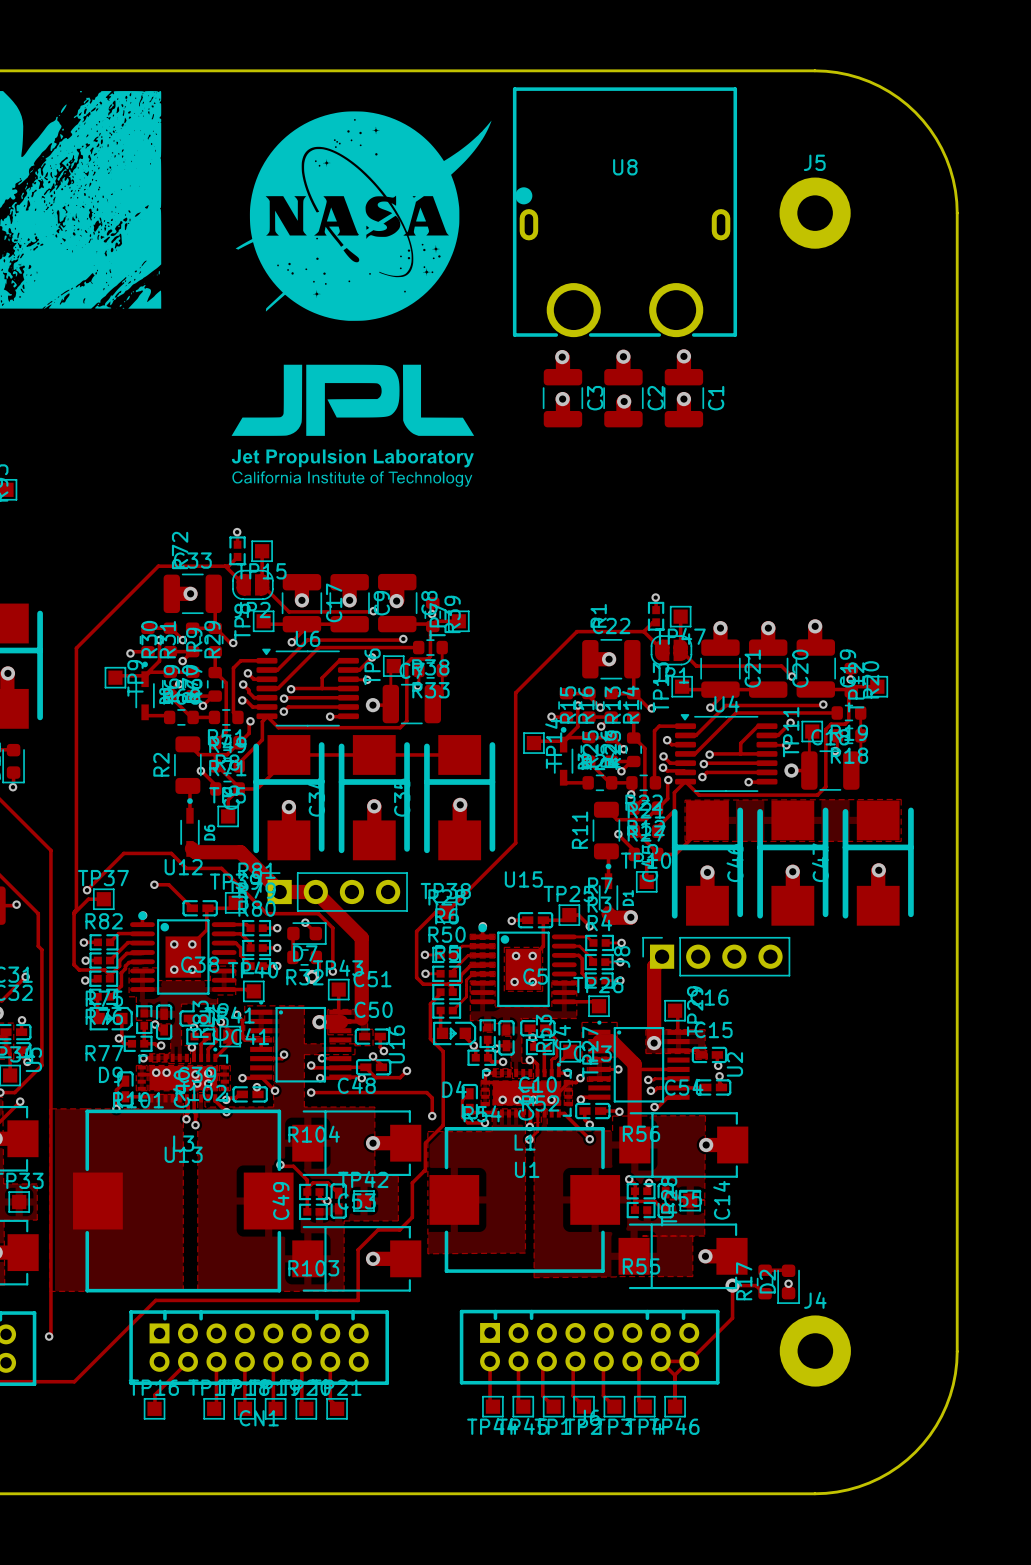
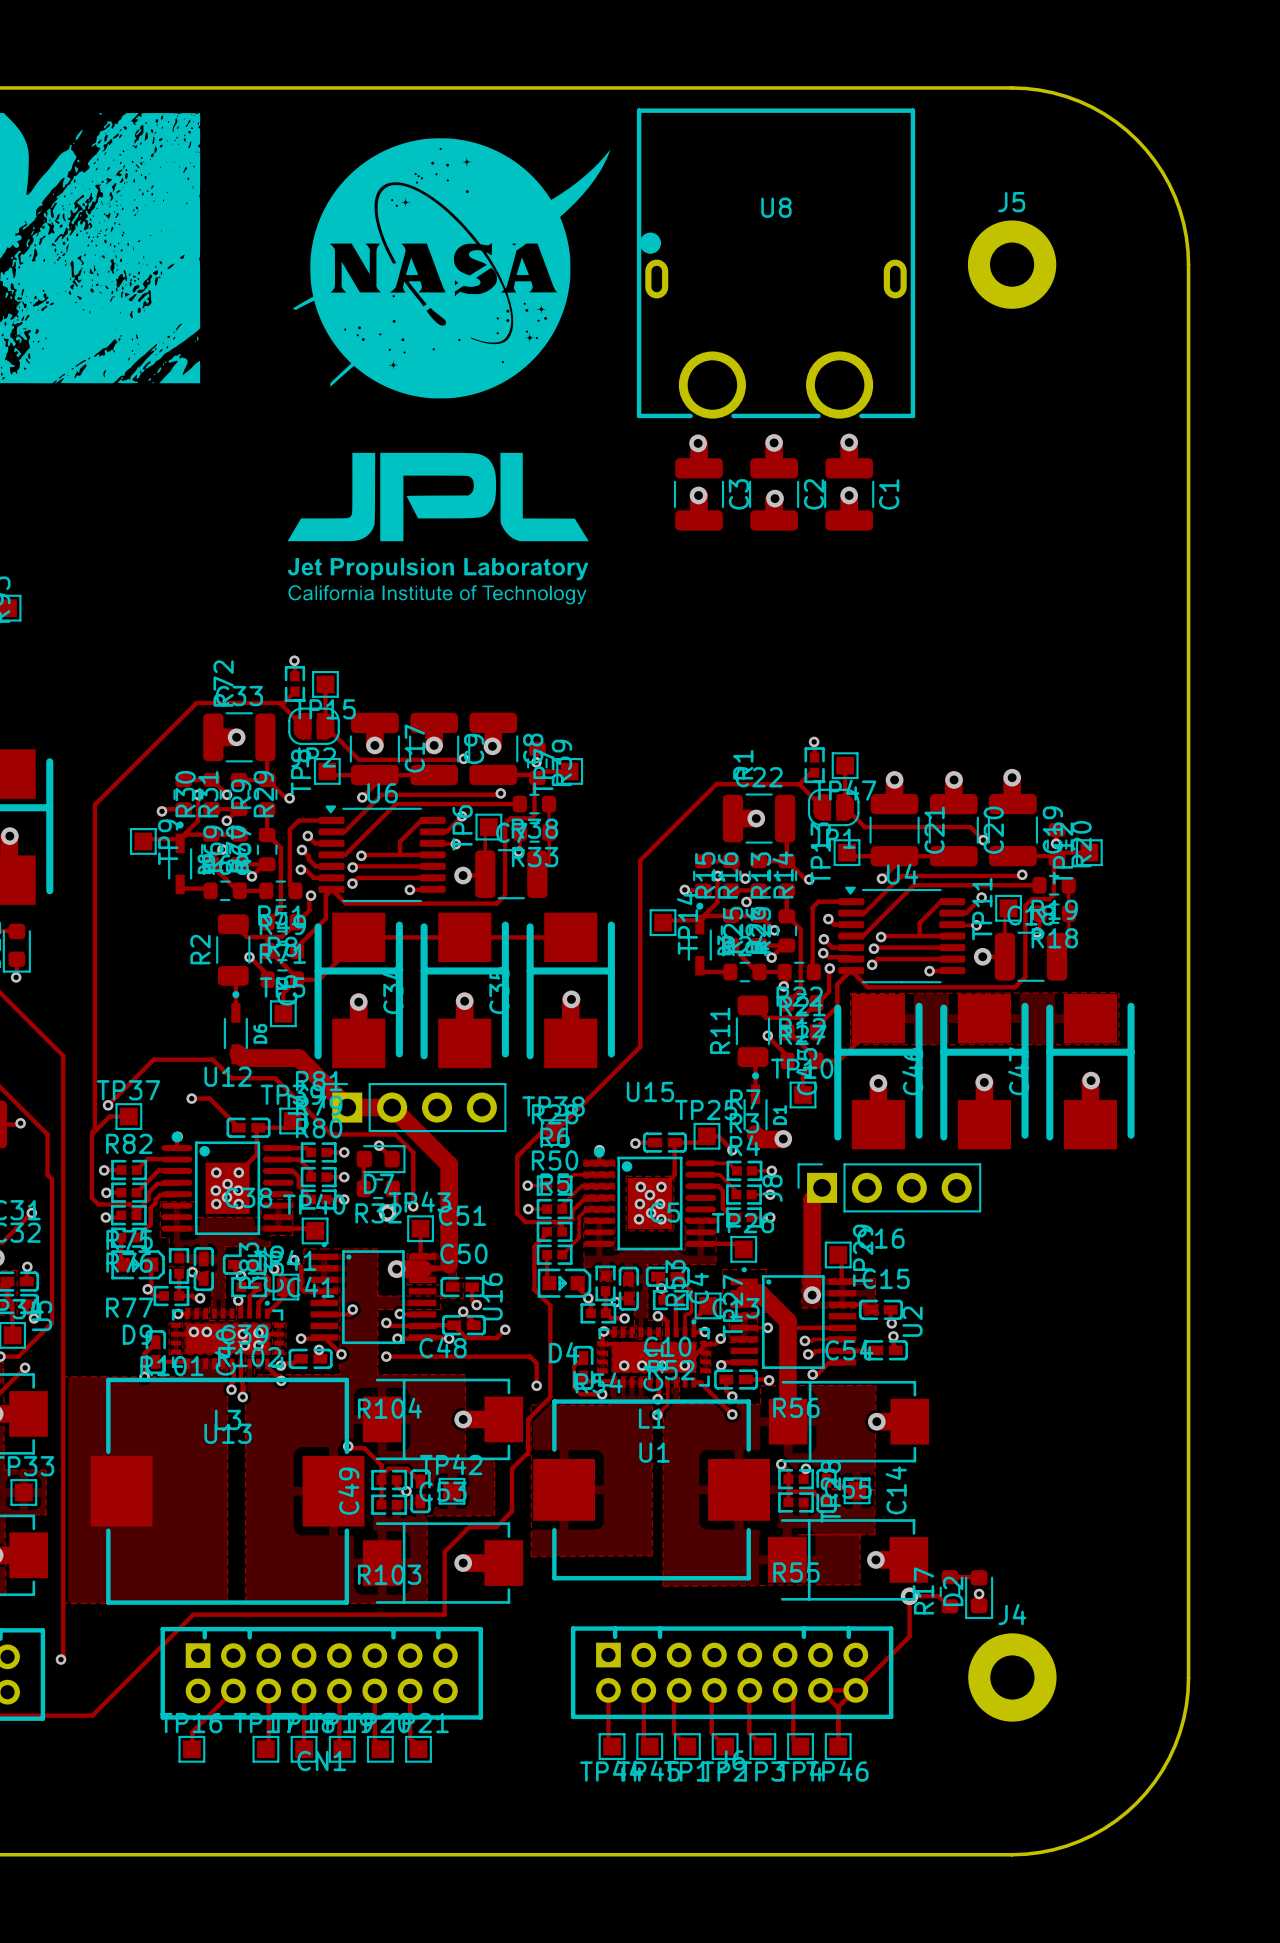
via: none -> (227, 1184)
via: none -> (215, 1190)
via: none -> (238, 1190)
via: none -> (649, 1195)
via: none -> (227, 1197)
via: none -> (639, 1204)
via: none -> (660, 1204)
via: none -> (651, 1213)

